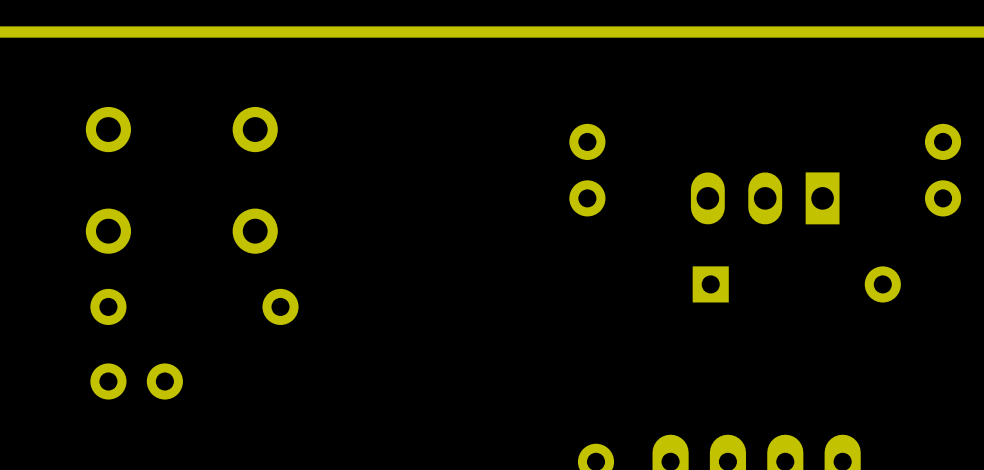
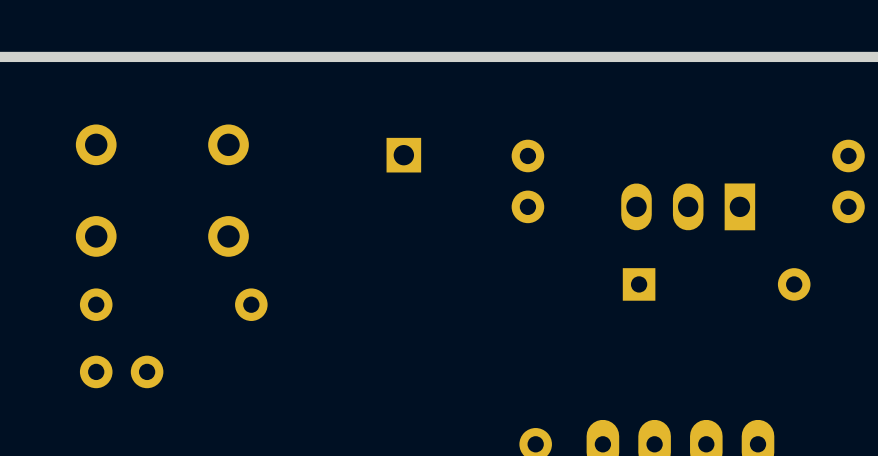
part: none -> (403, 155)

